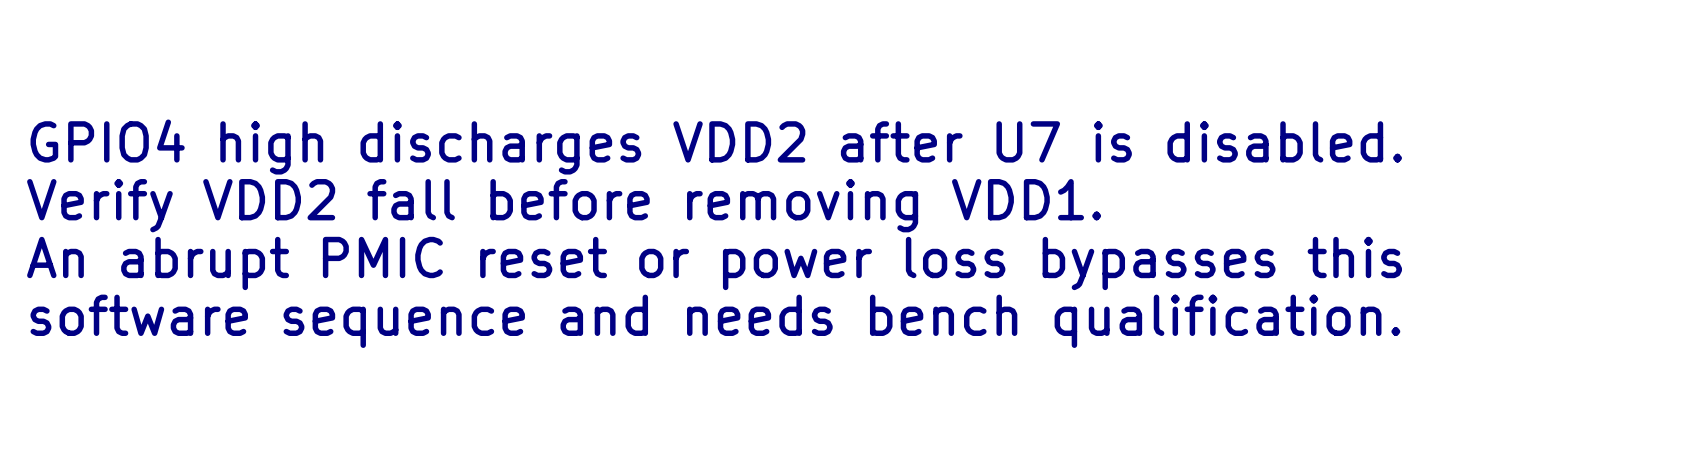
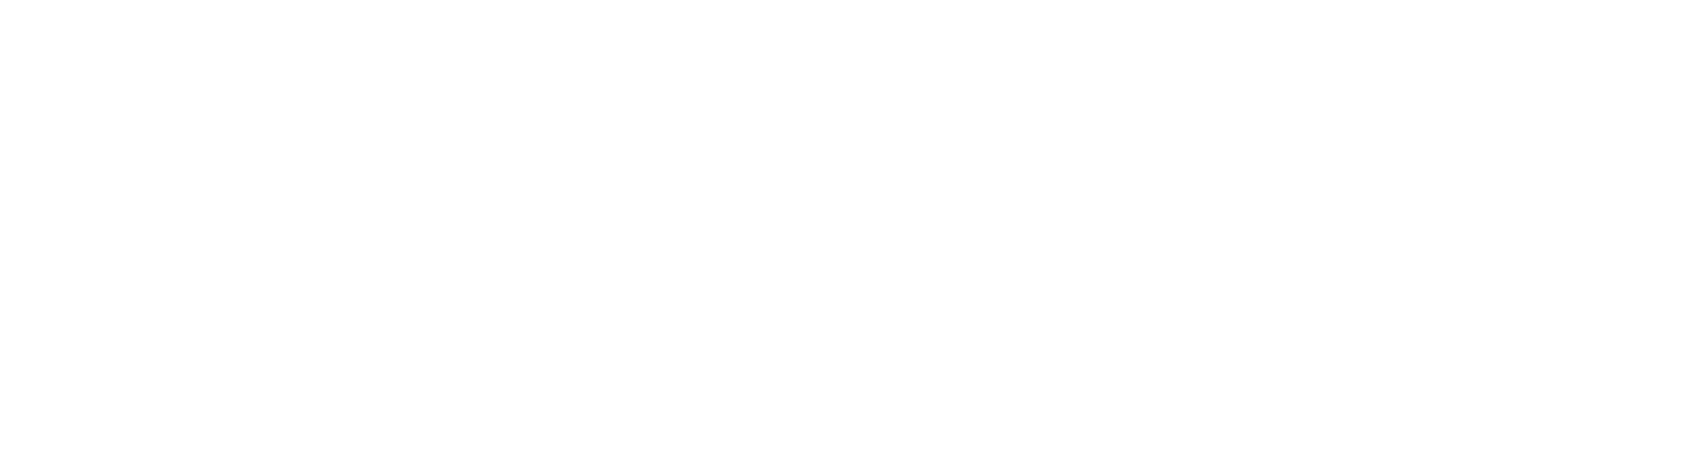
text: GPIO4 high discharges VDD2 after U7 is disabled. (716, 147) -> none
text: Verify VDD2 fall before removing VDD1. (564, 205) -> none
text: An abrupt PMIC reset or power loss bypasses this (714, 263) -> none
text: software sequence and needs bench qualification. (715, 321) -> none

